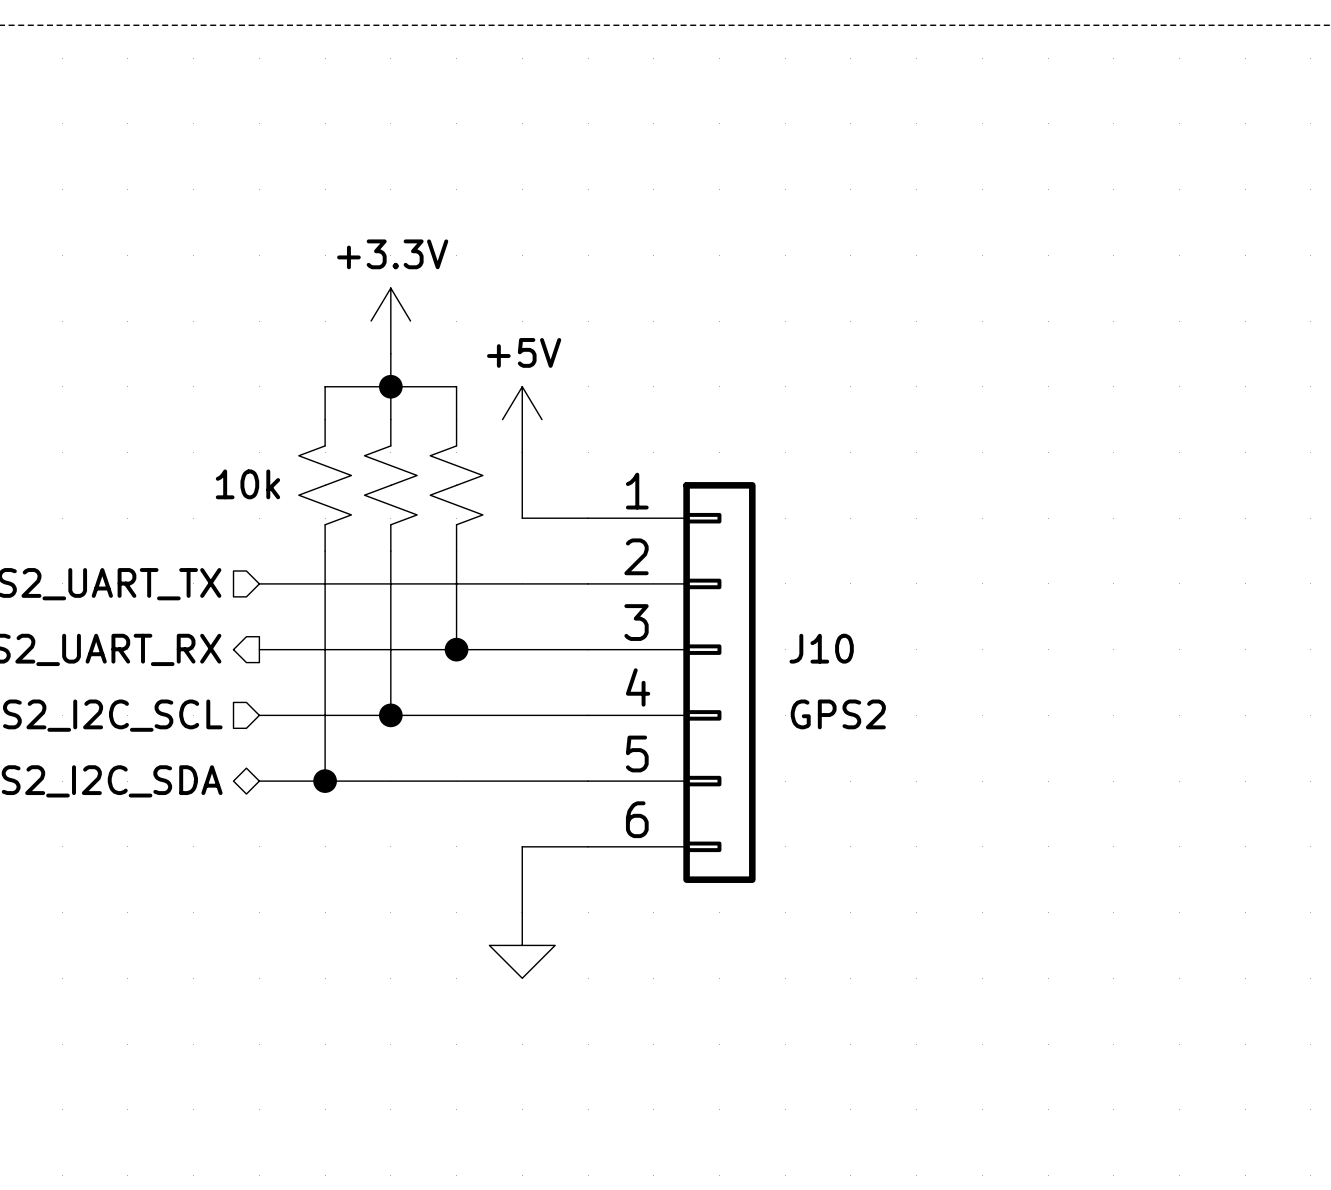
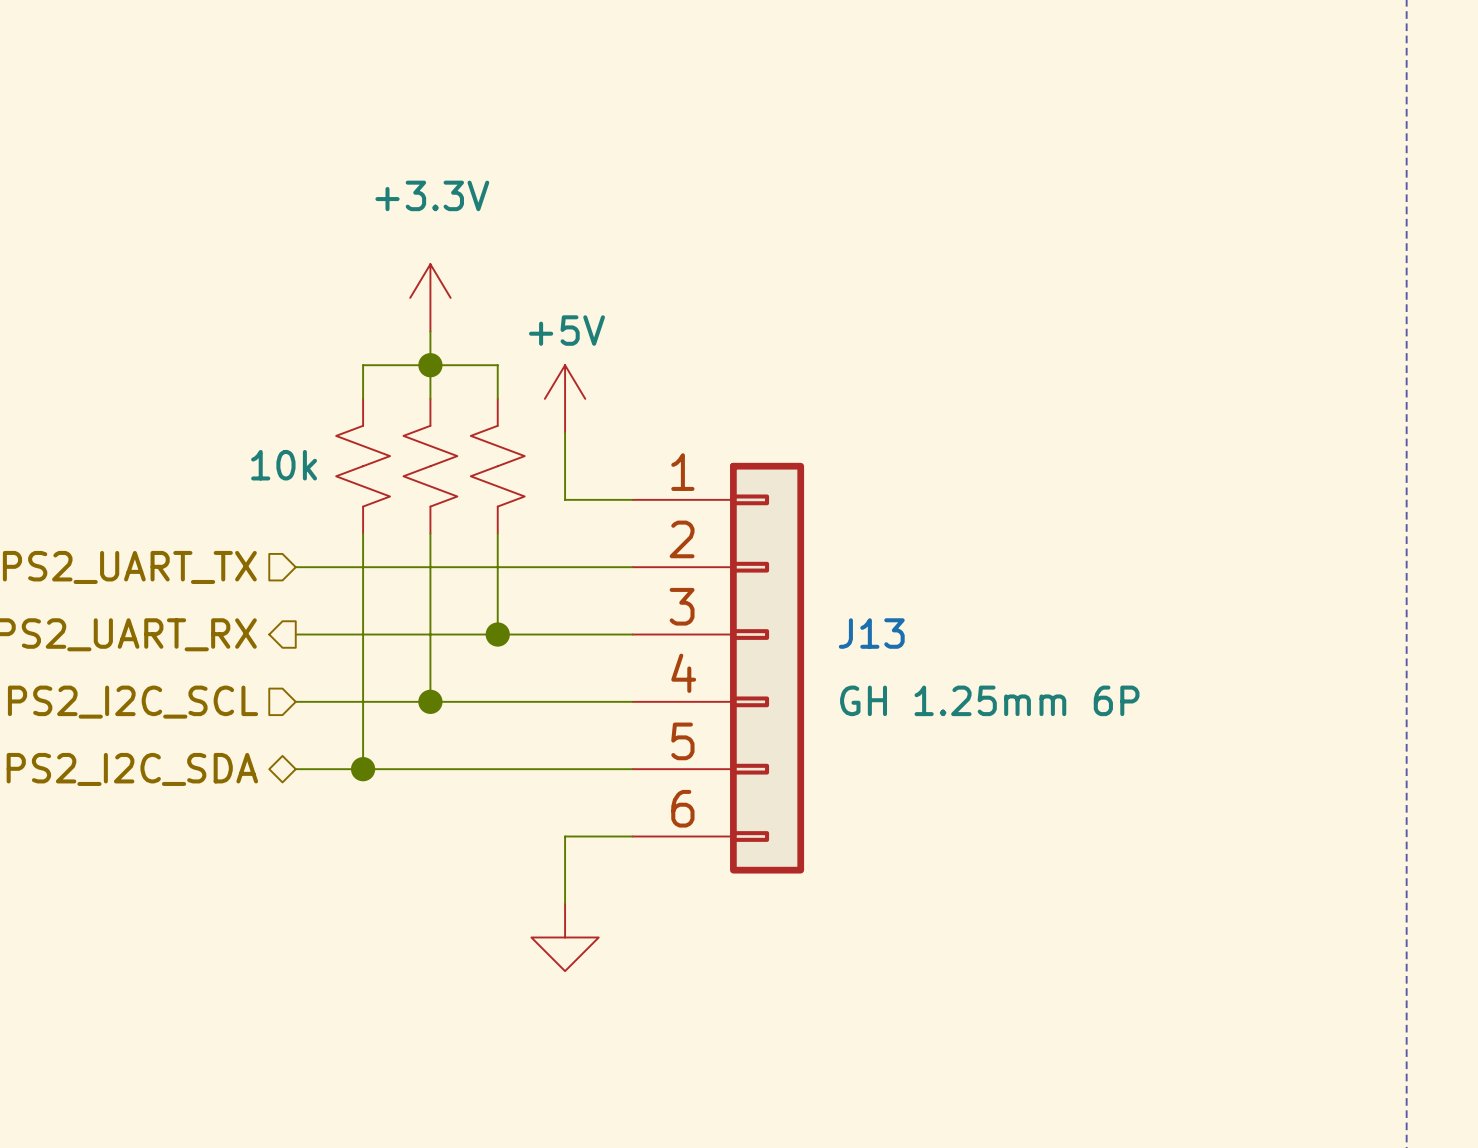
power symbol text position: +3.3V (392, 254) -> +3.3V (432, 195)
J10 name: J10 (821, 648) -> J13 (871, 633)
J10 value: GPS2 (838, 714) -> GH 1.25mm 6P (989, 700)

